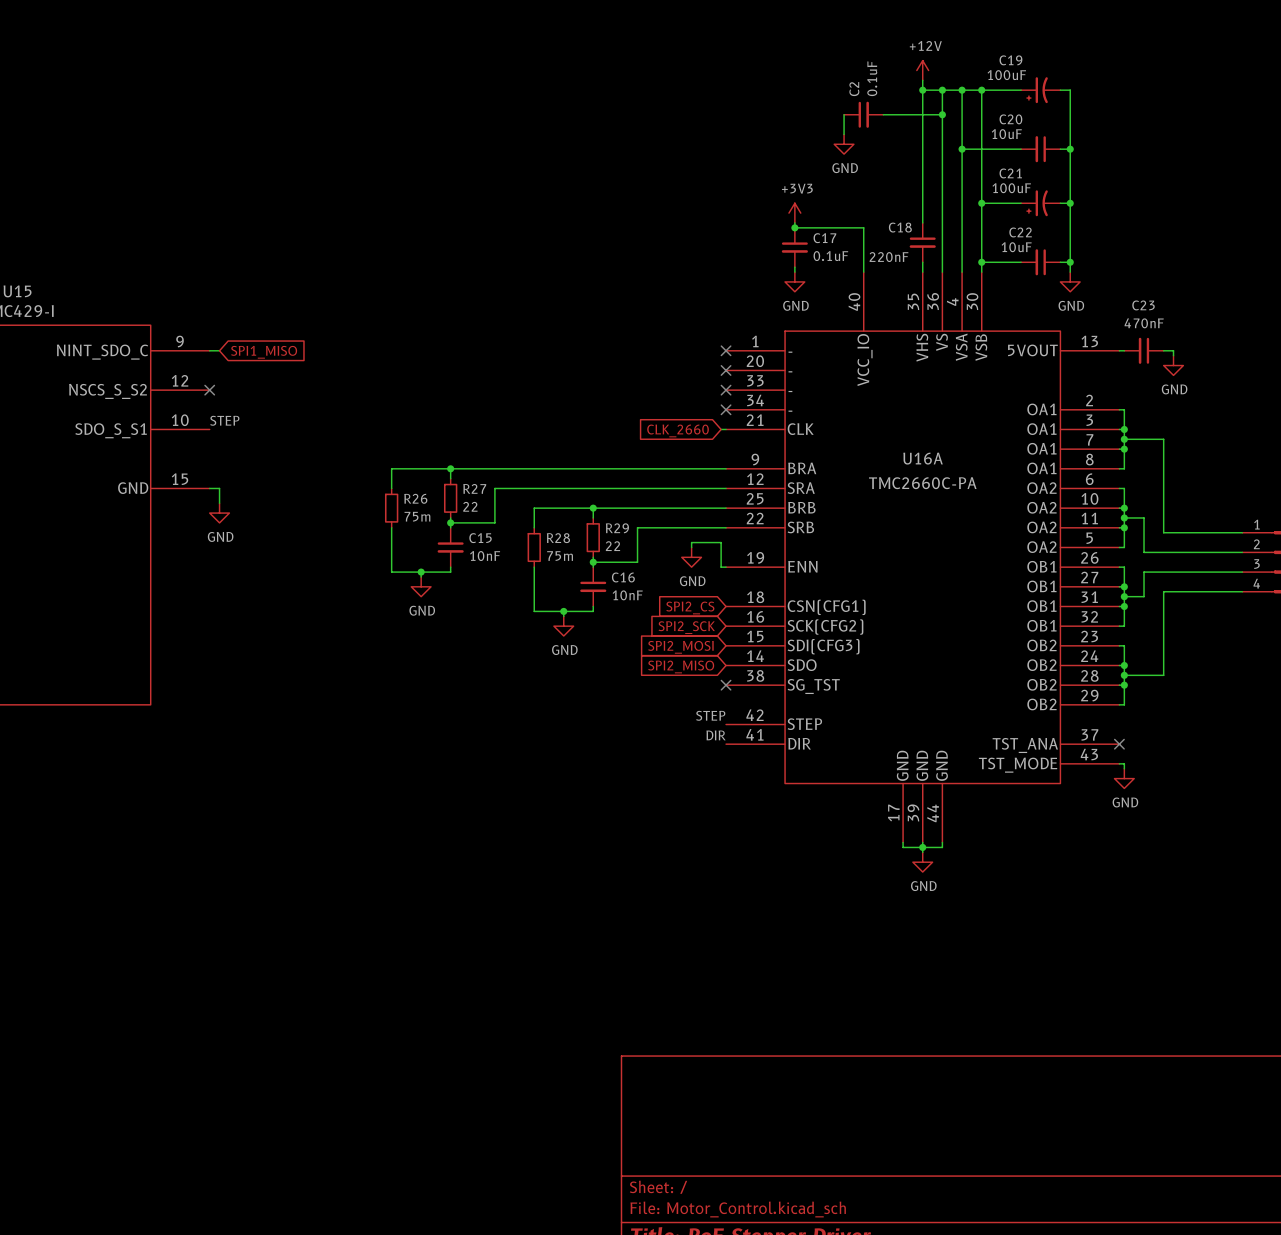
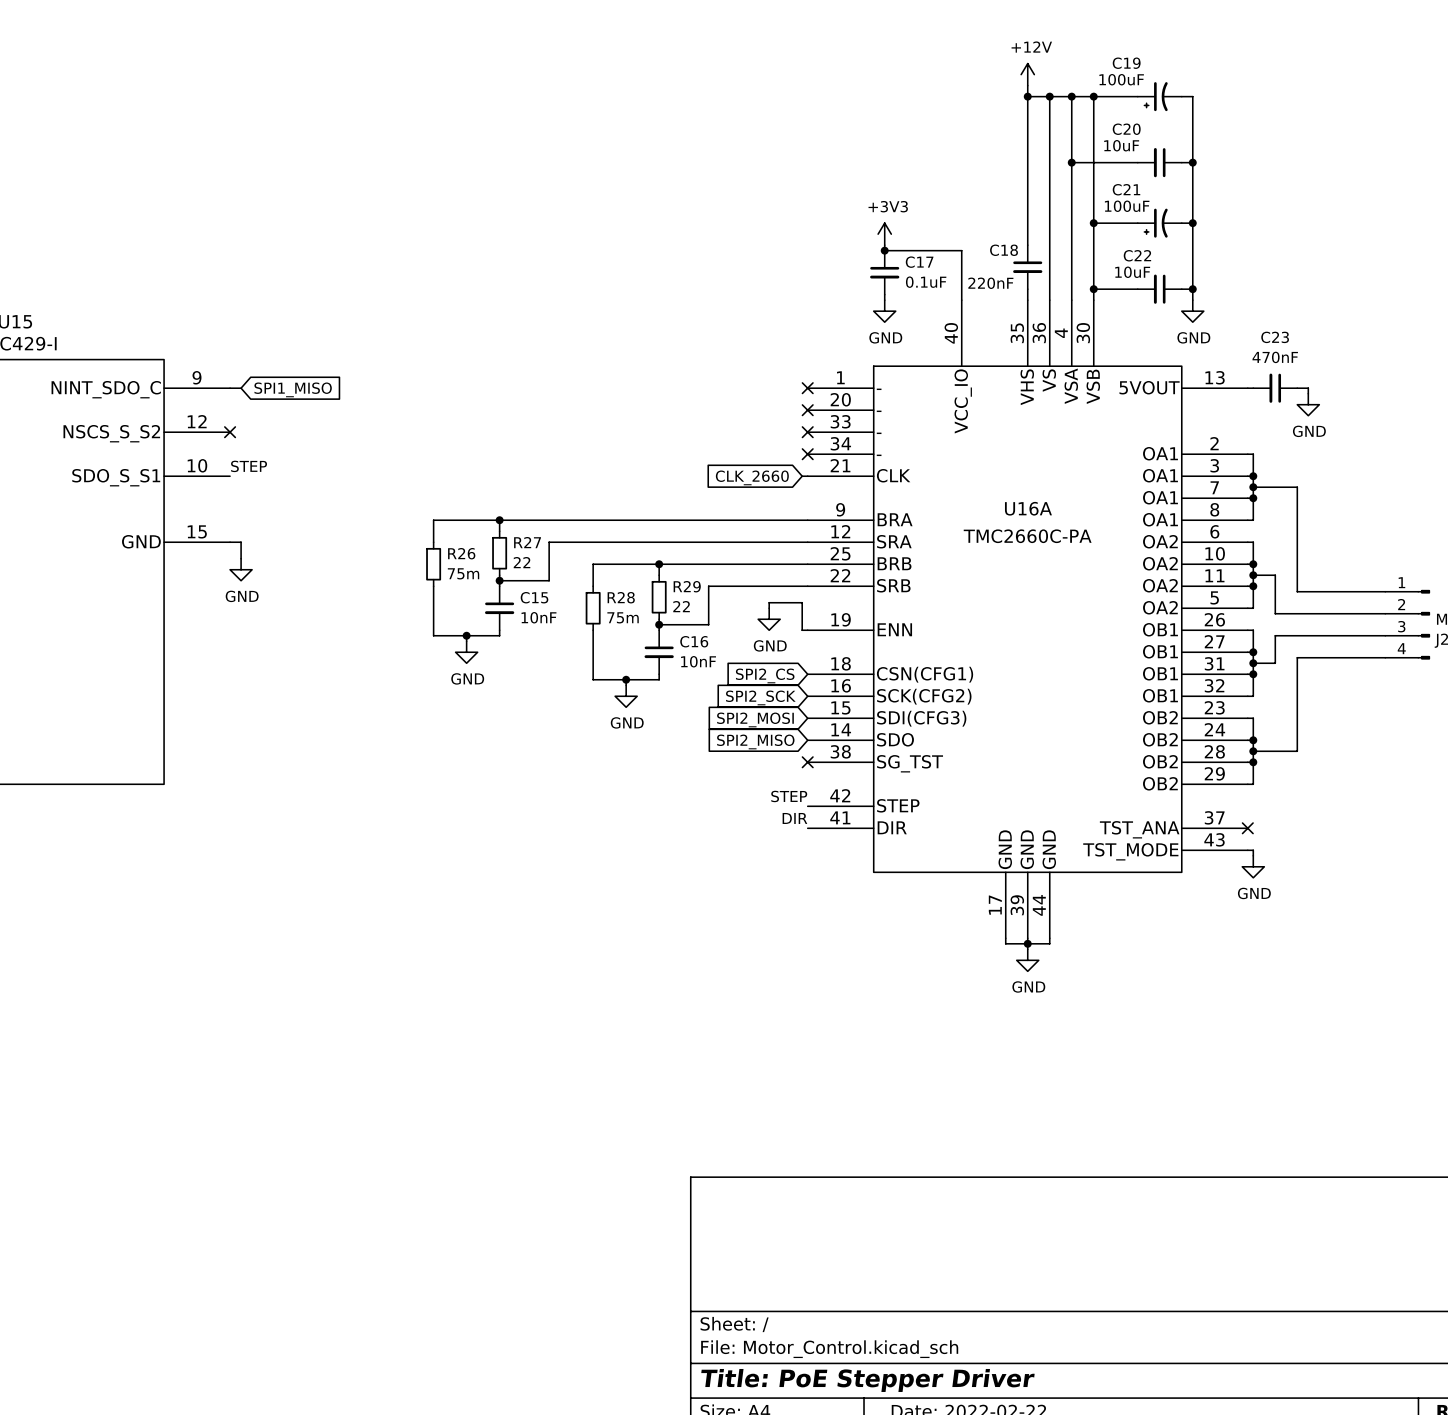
wire: (844, 114) (844, 134) -> none
C2: 0.1uF (863, 114) -> none
wire: (883, 114) (942, 114) -> none
junction: (942, 114) -> none
power symbol: GND (844, 144) -> none

